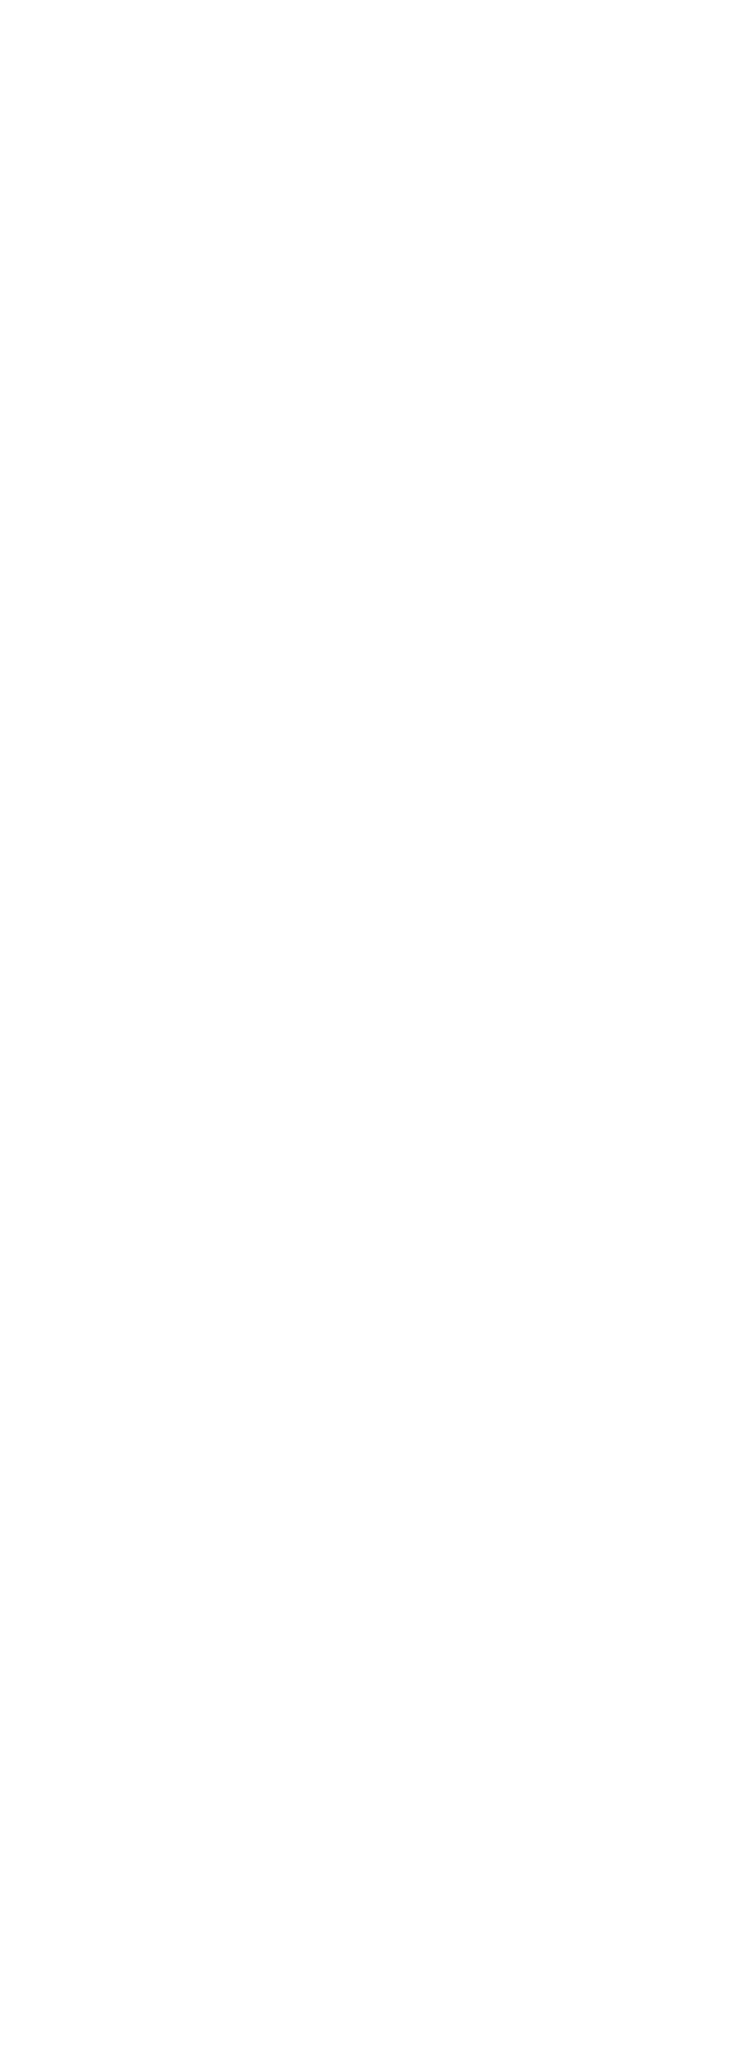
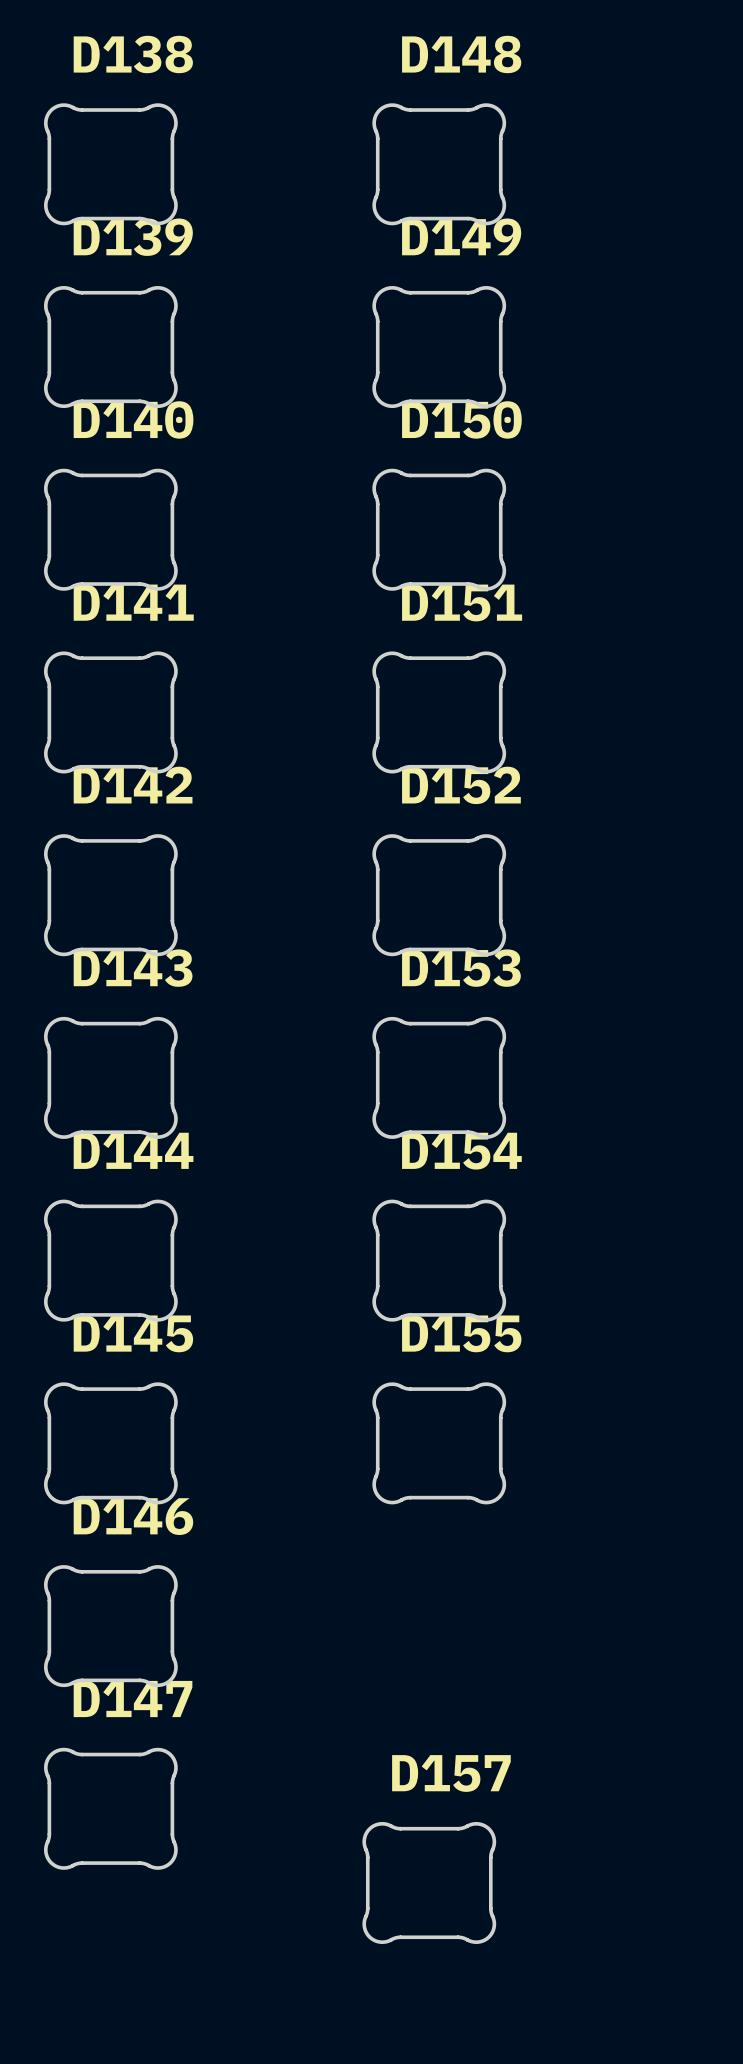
D138: none -> (110, 164)
D148: none -> (439, 164)
D139: none -> (110, 347)
D149: none -> (439, 347)
D140: none -> (110, 529)
D150: none -> (439, 529)
D141: none -> (110, 712)
D151: none -> (439, 712)
D142: none -> (110, 895)
D152: none -> (439, 895)
D143: none -> (110, 1077)
D153: none -> (439, 1077)
D144: none -> (110, 1260)
D154: none -> (439, 1260)
D145: none -> (110, 1443)
D155: none -> (439, 1443)
D146: none -> (110, 1626)
D147: none -> (110, 1808)
D157: none -> (429, 1882)

